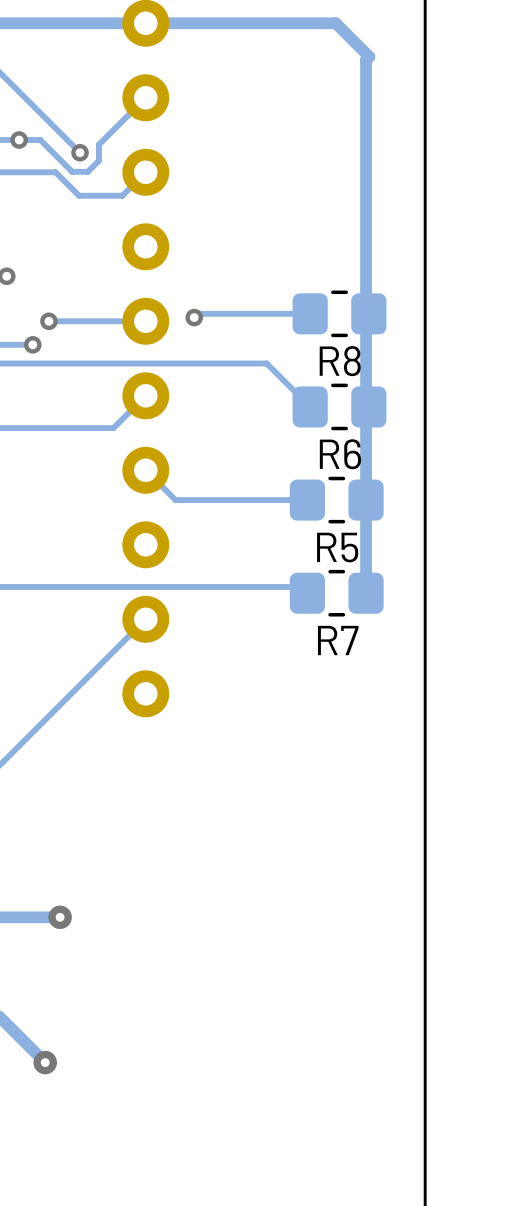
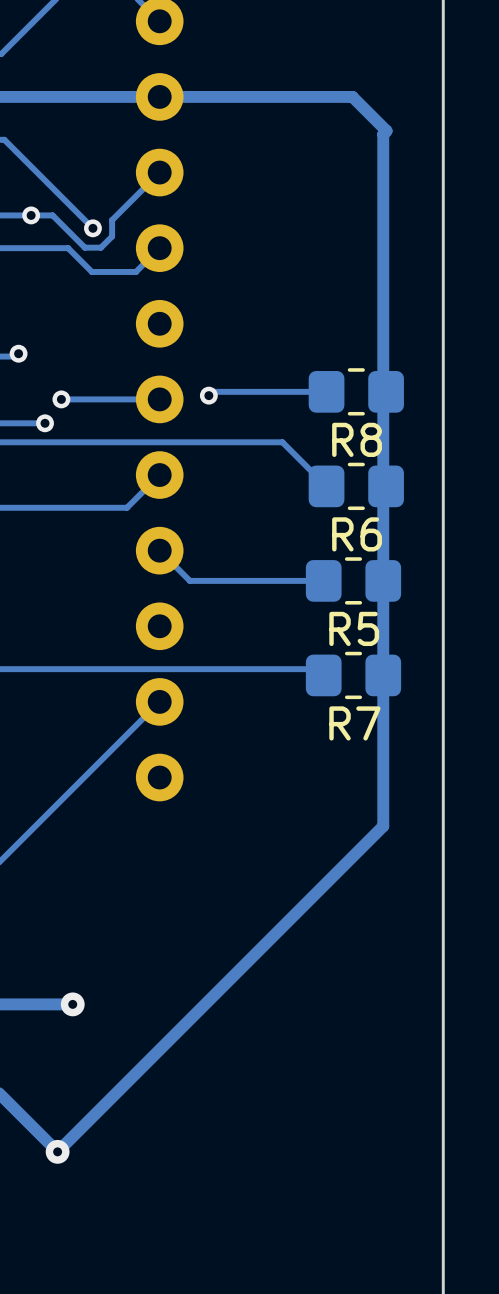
track: none -> (383, 675) (383, 826) (57, 1151)

